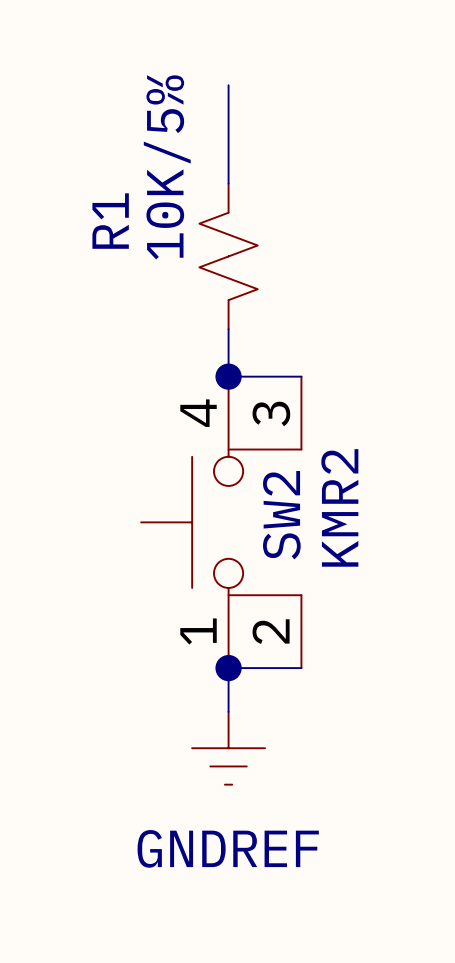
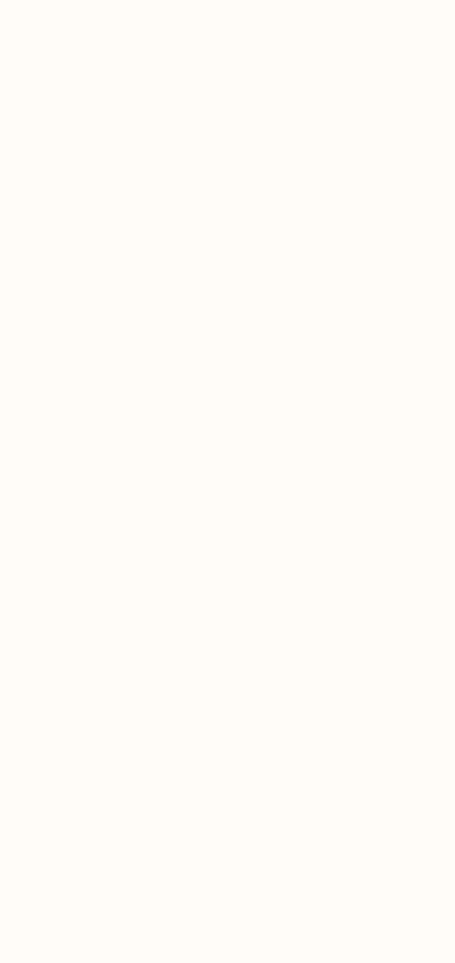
wire: (228, 85) (228, 183) -> none
R1: 10K/5% (228, 256) -> none
wire: (228, 329) (228, 376) (301, 376) -> none
junction: (228, 376) -> none
SW2: KMR2 (221, 522) -> none
junction: (228, 668) -> none
wire: (301, 668) (228, 668) (228, 711) -> none
power symbol: GNDREF (228, 748) -> none

